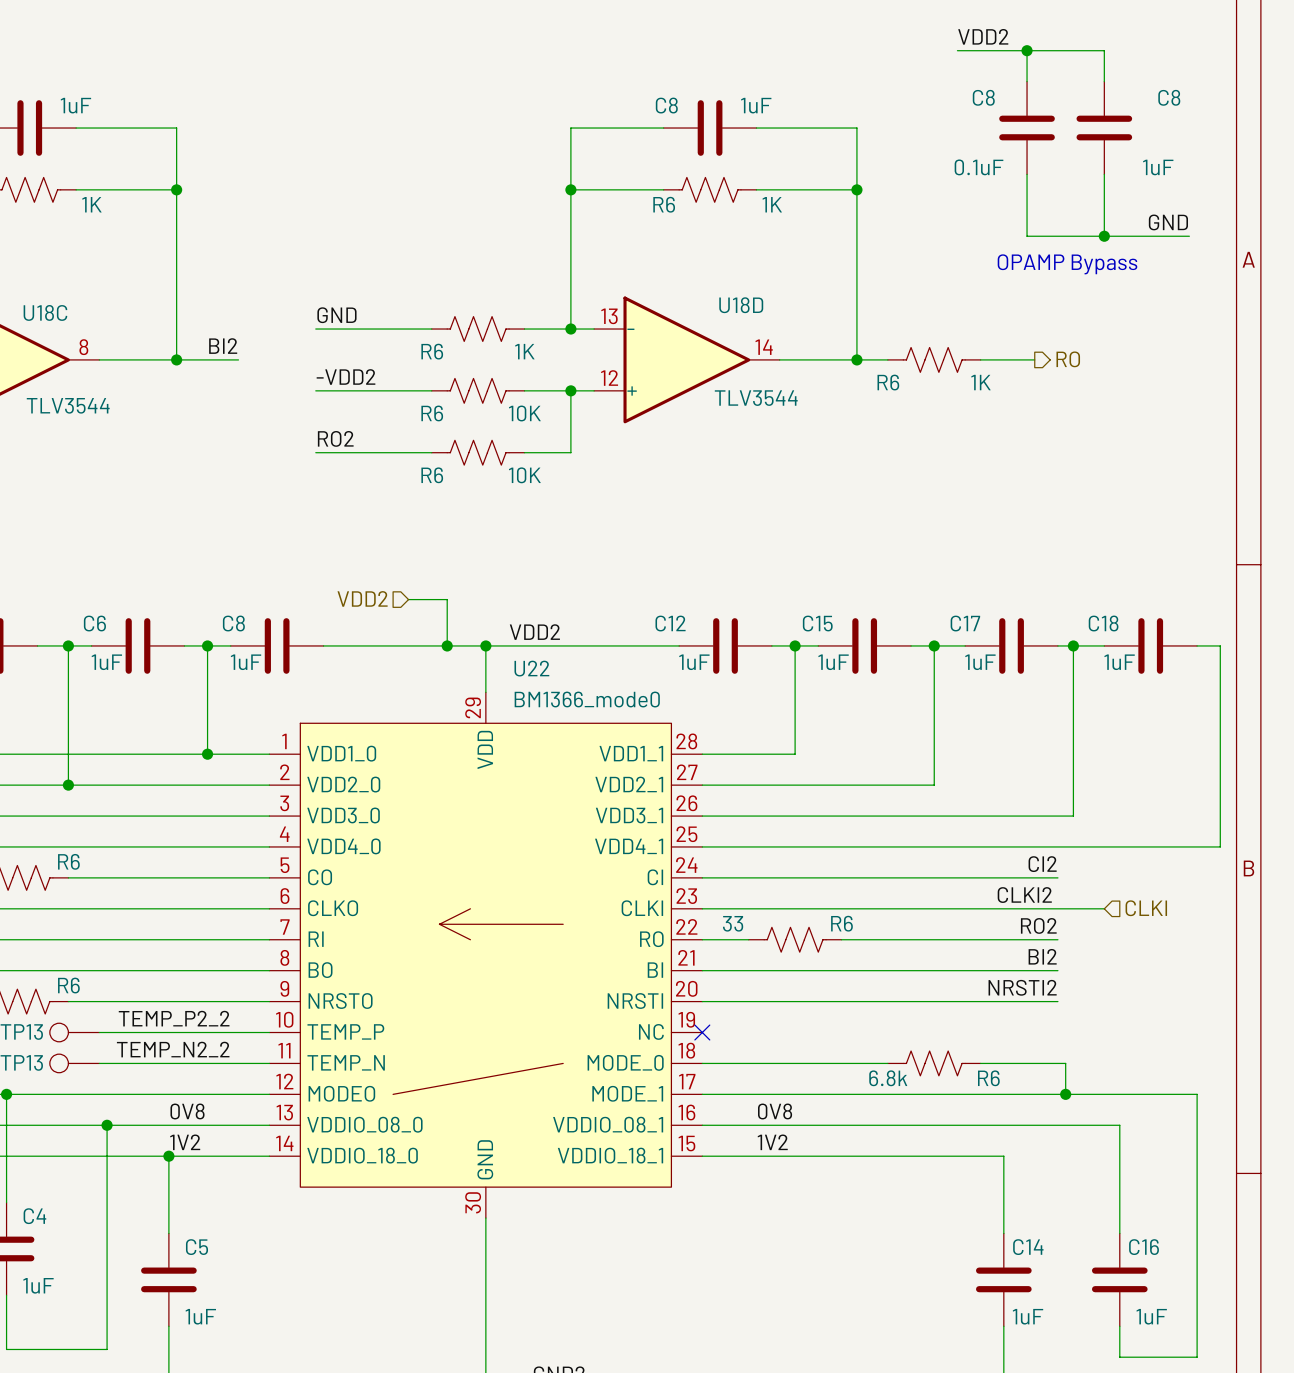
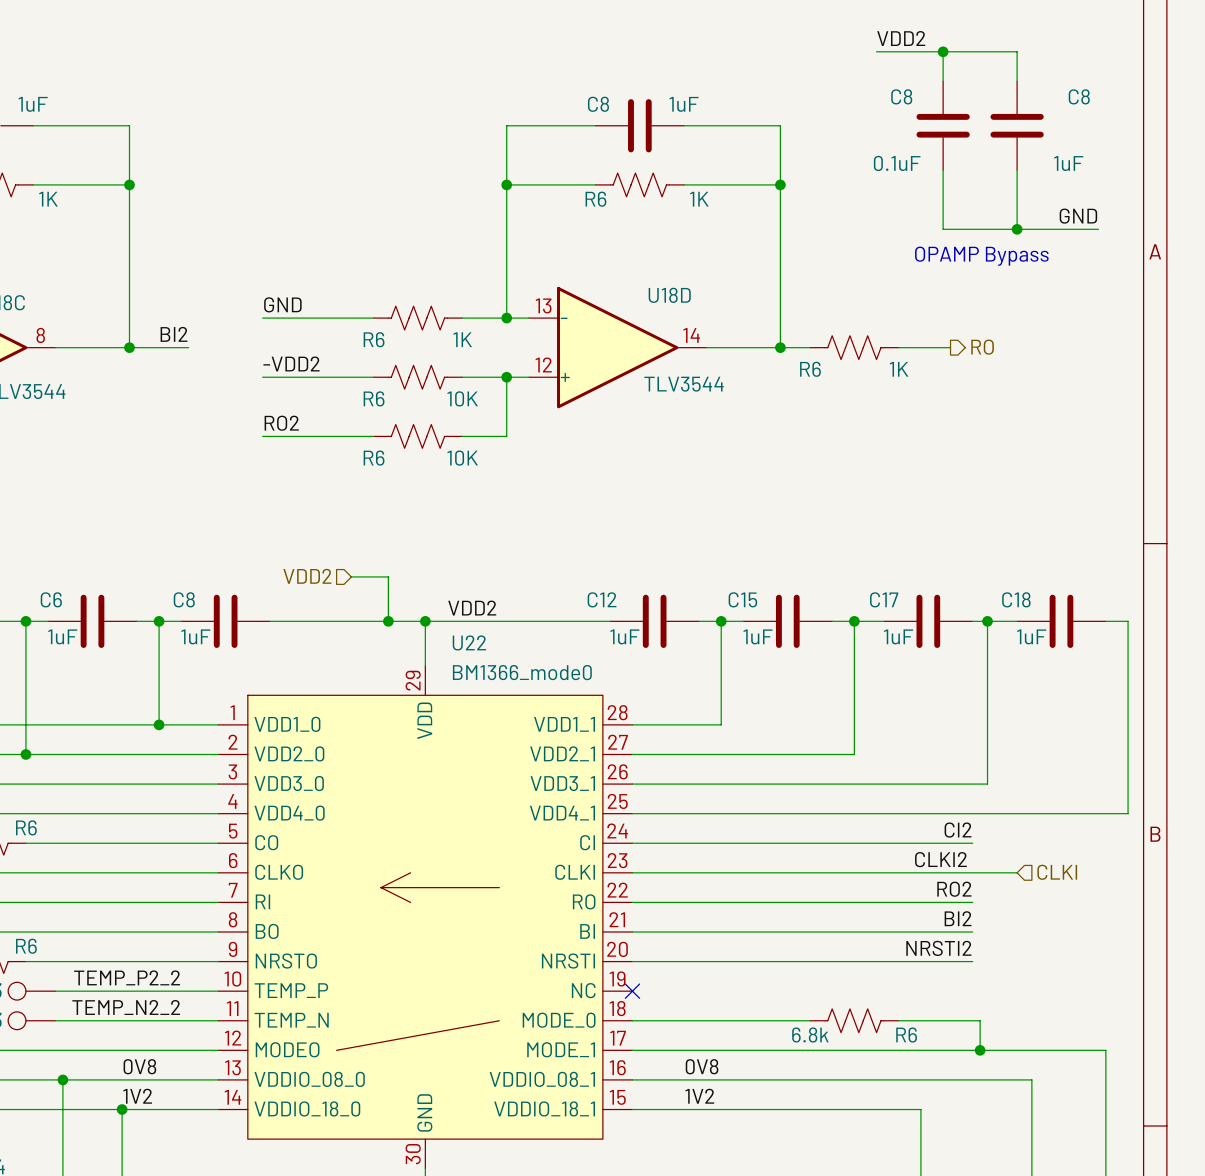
R6: 33 (795, 939) -> none

